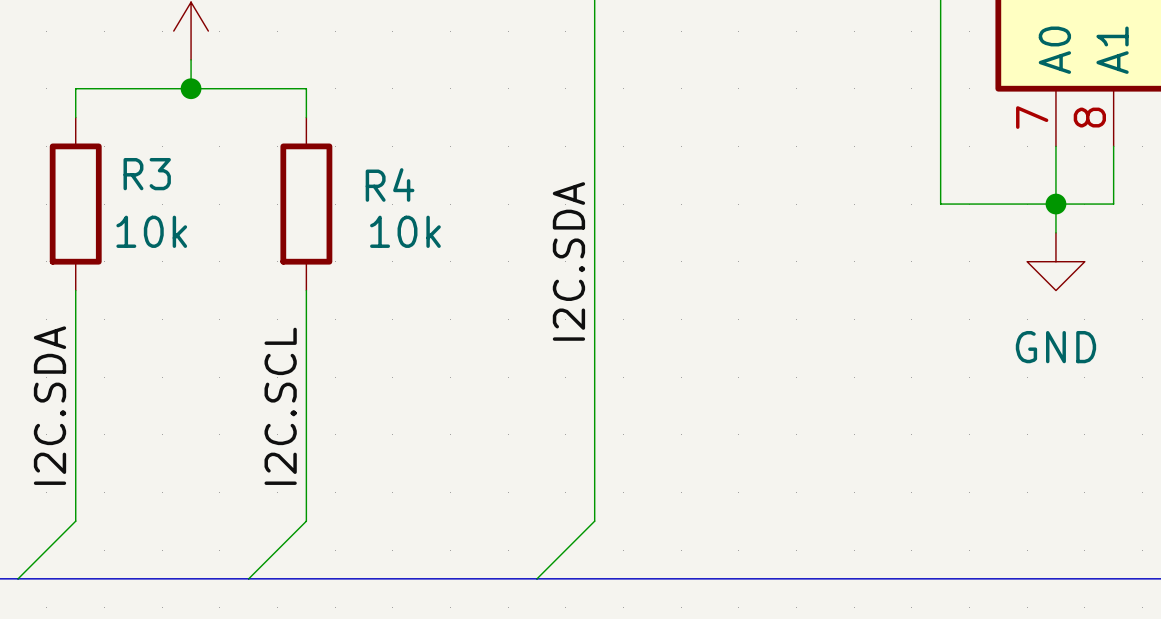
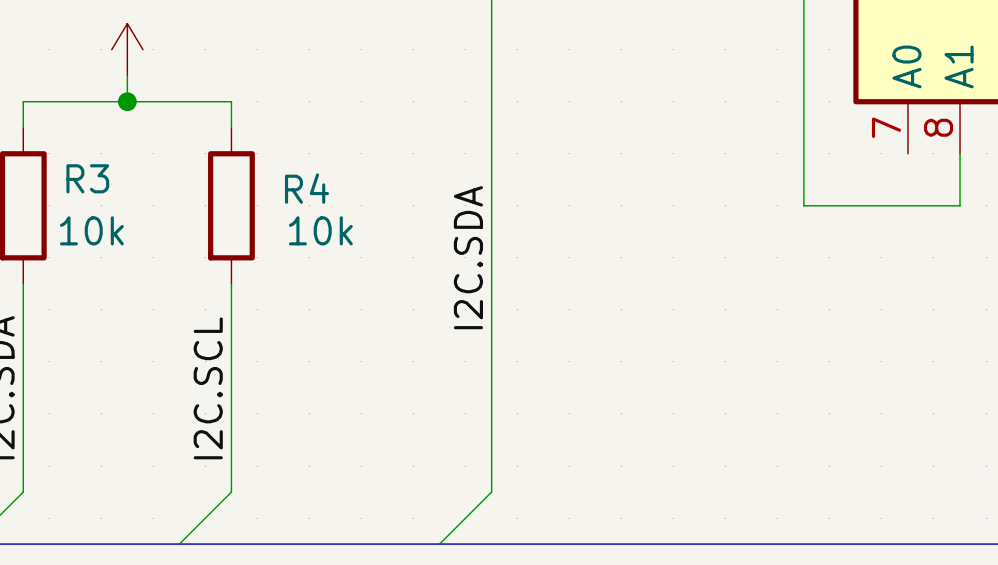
wire: (1055, 146) (1055, 232) -> none
junction: (1055, 204) -> none
power symbol: GND (1055, 261) -> none

